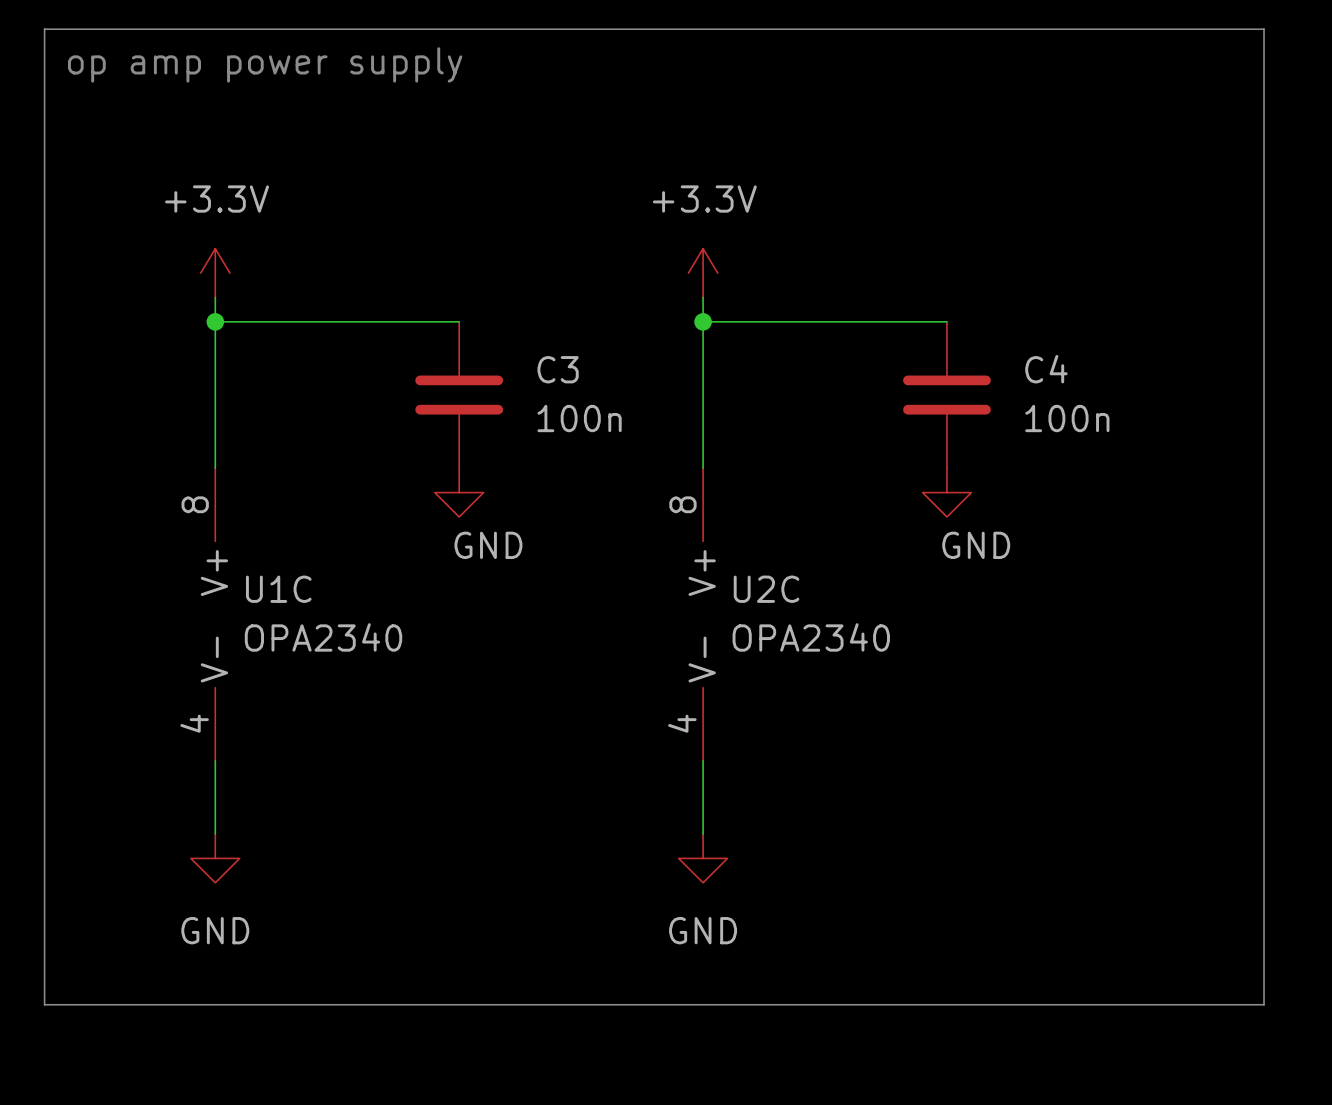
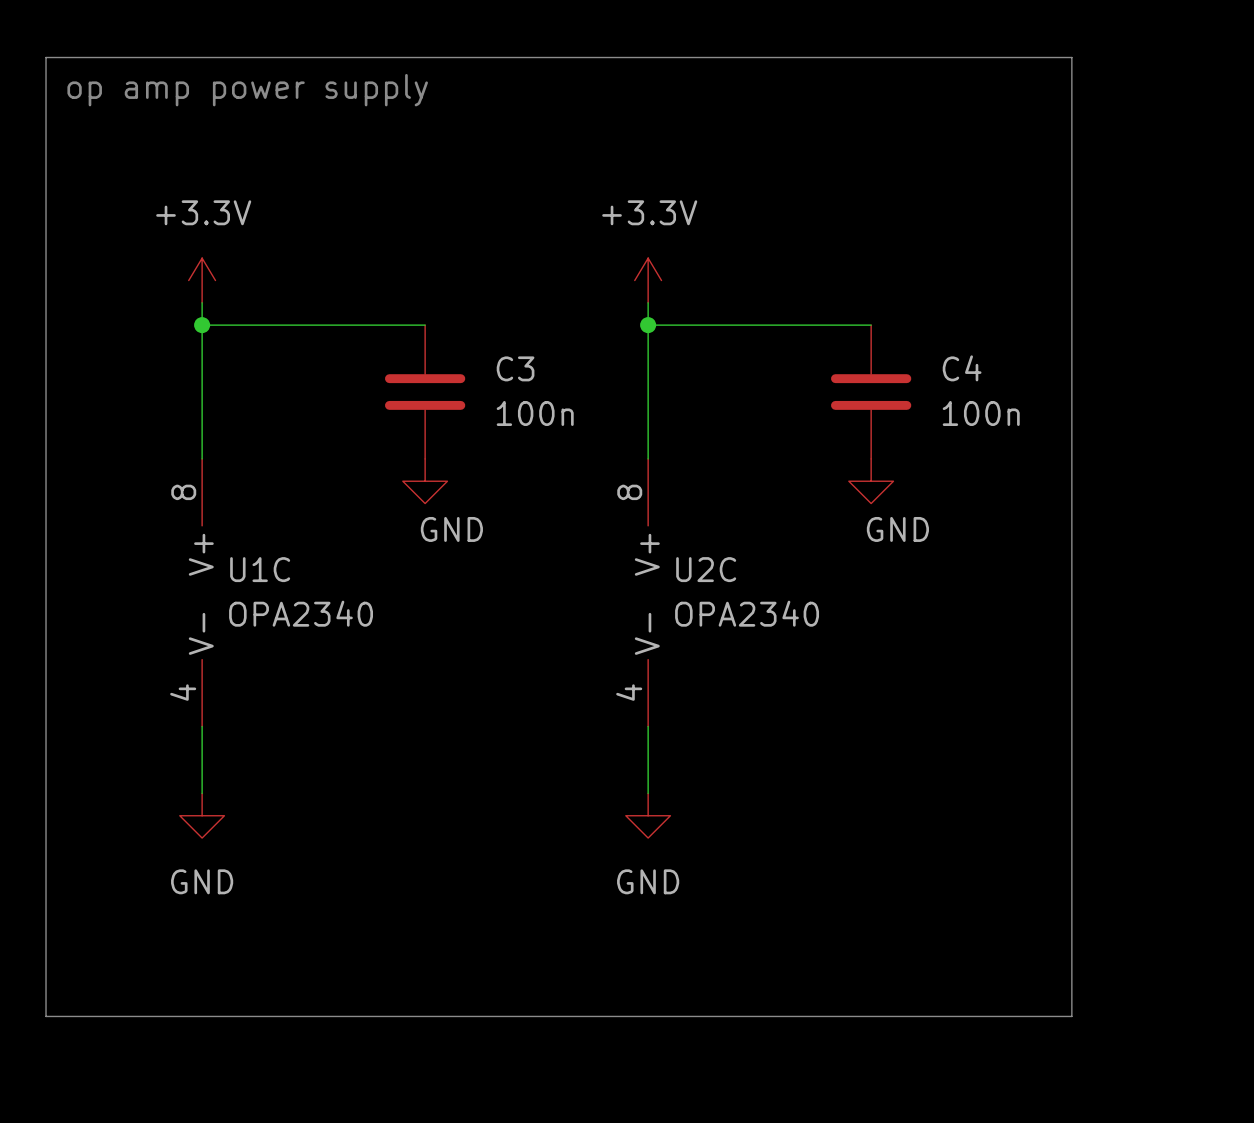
line: (1166, 29) (1264, 29) (1264, 1004) (44, 1004) -> (1071, 57) (1071, 1016) (46, 1016) (46, 949)

